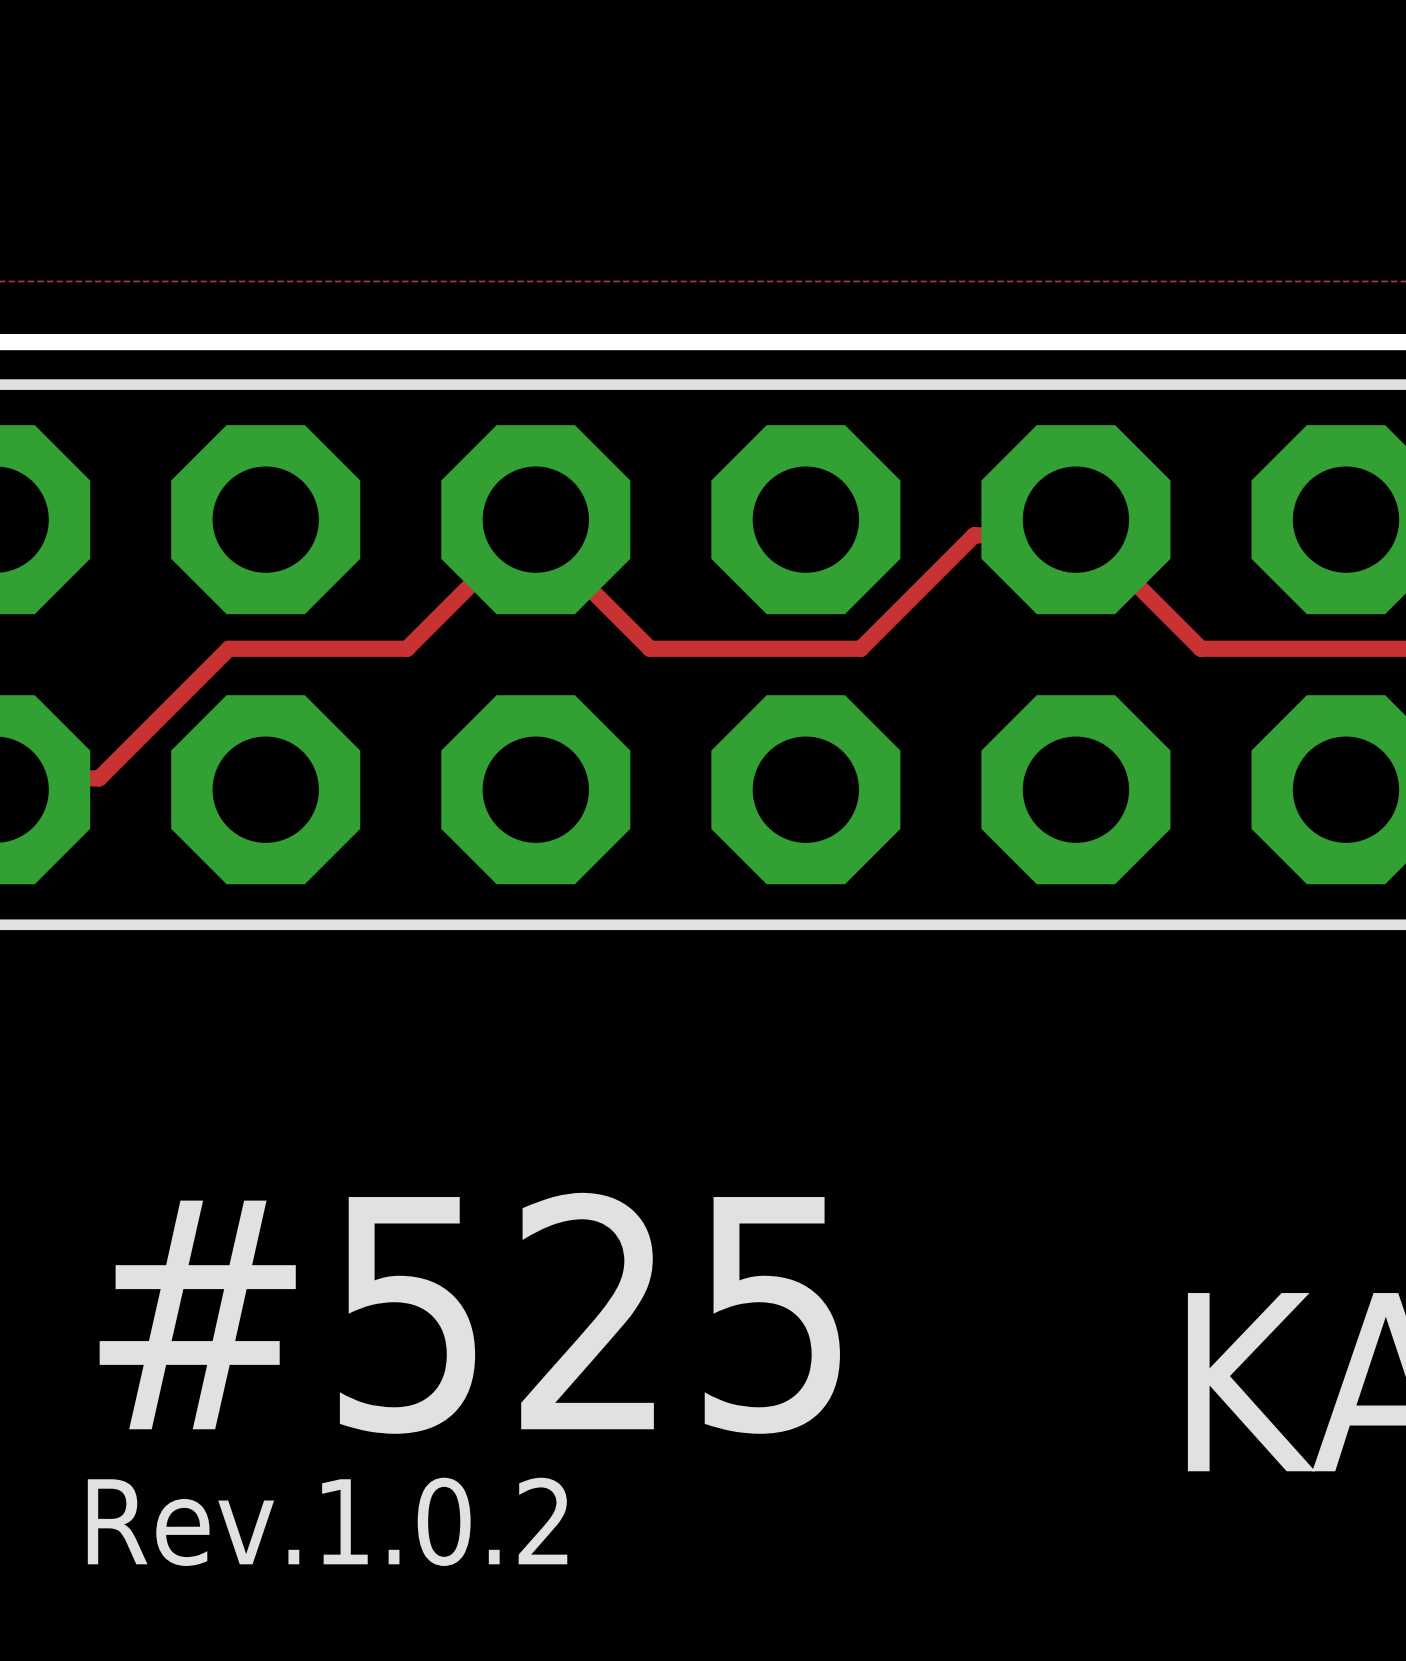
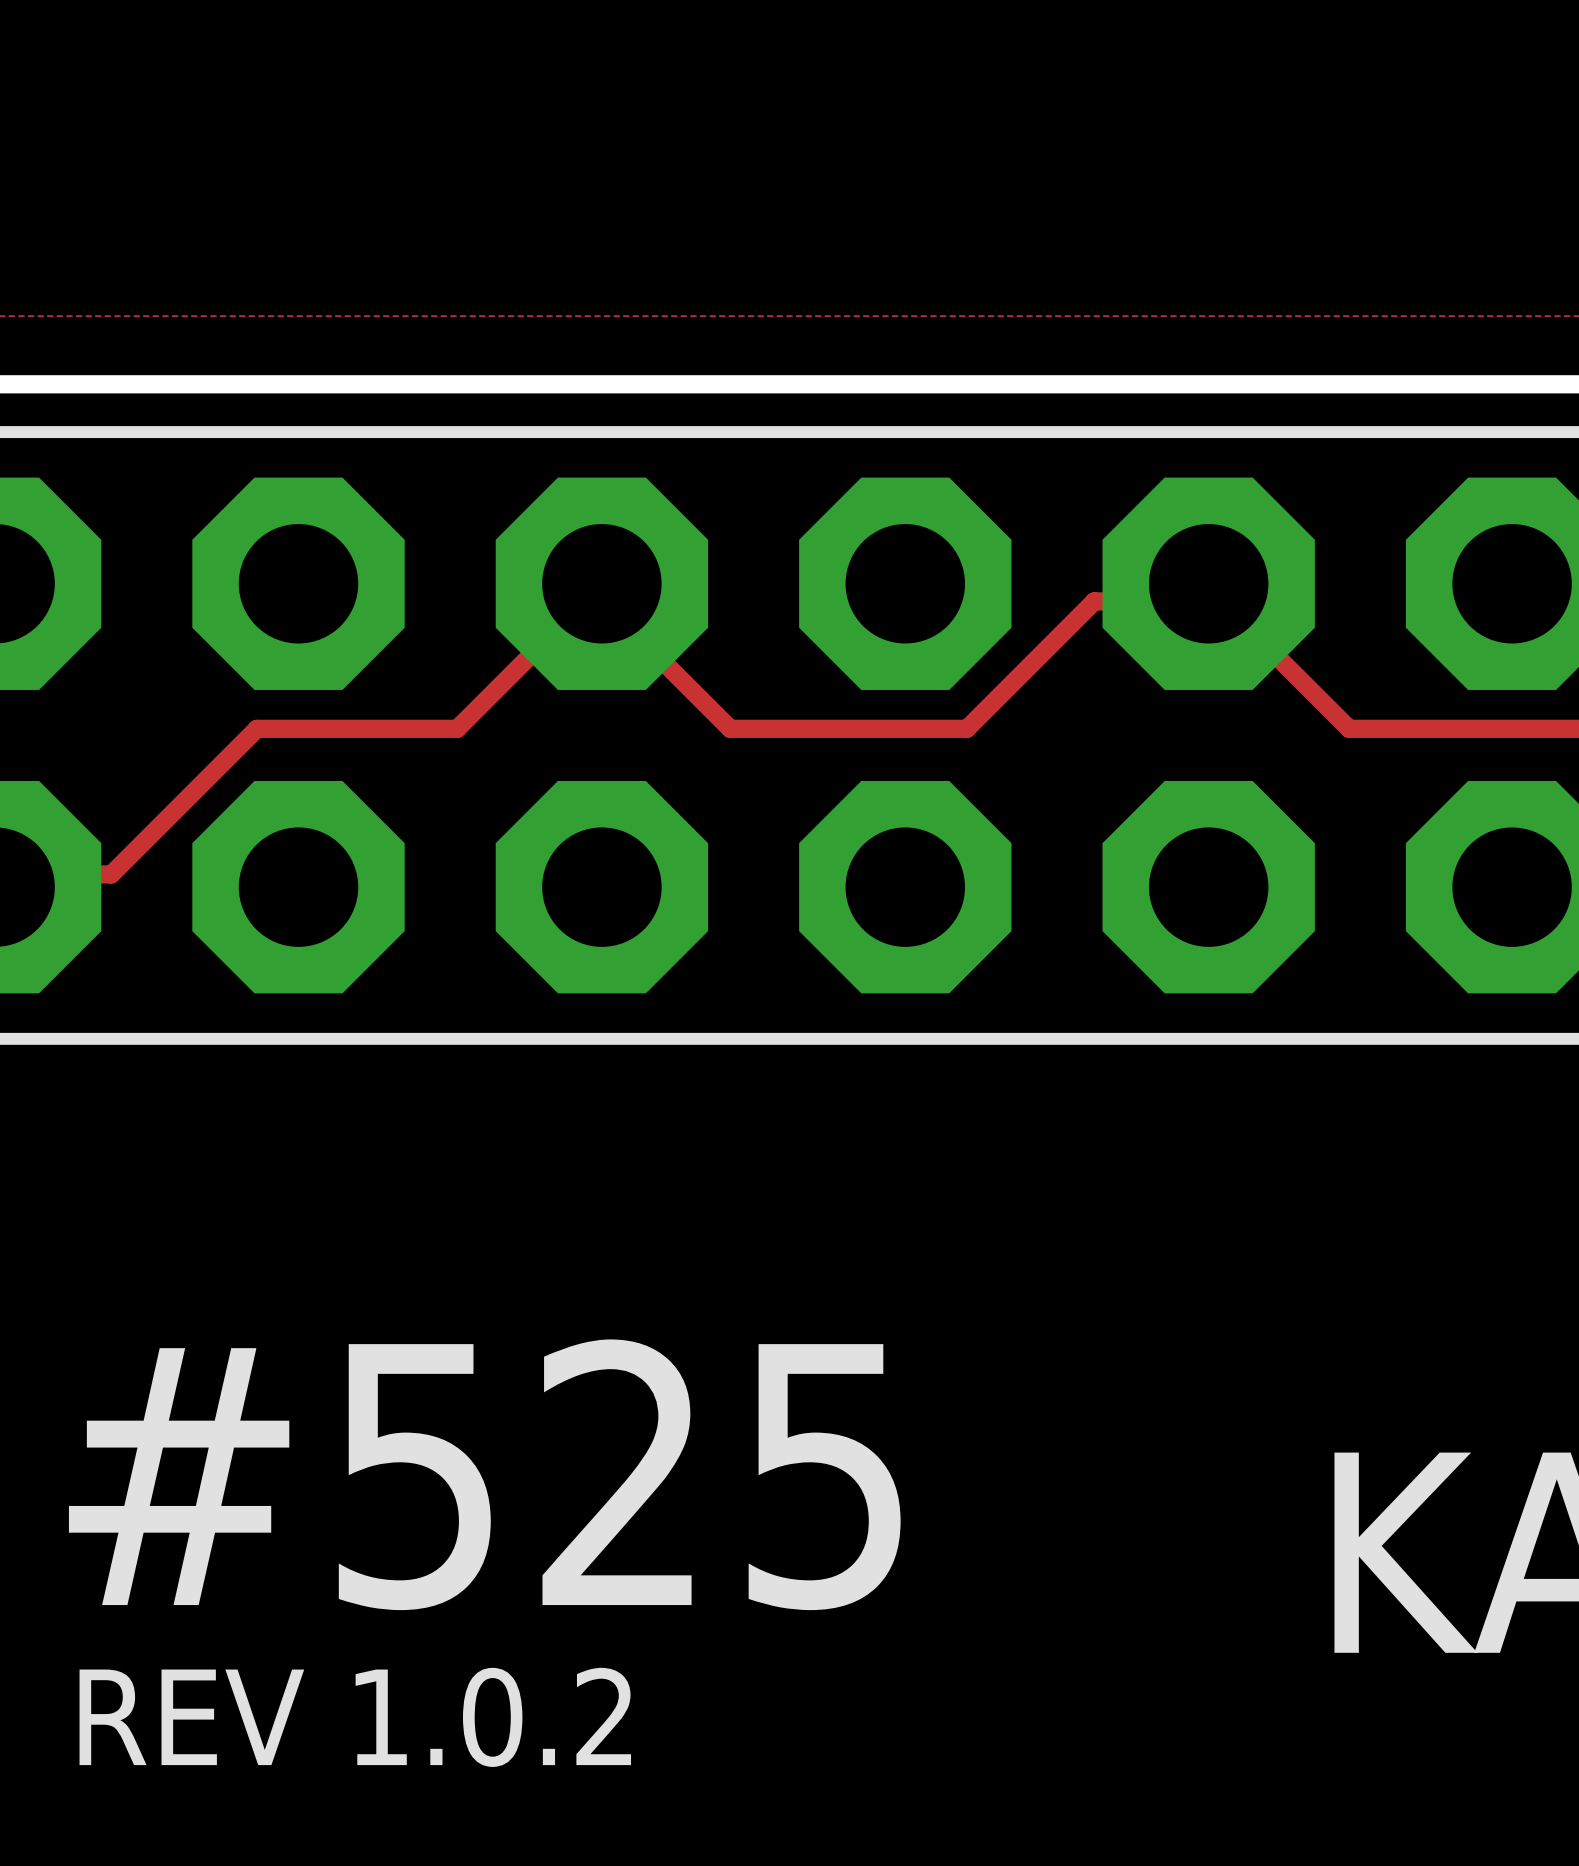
text position: #525 (469, 1313) -> #525 (484, 1474)
text: Rev.1.0.2 (327, 1521) -> REV 1.0.2 (355, 1717)

